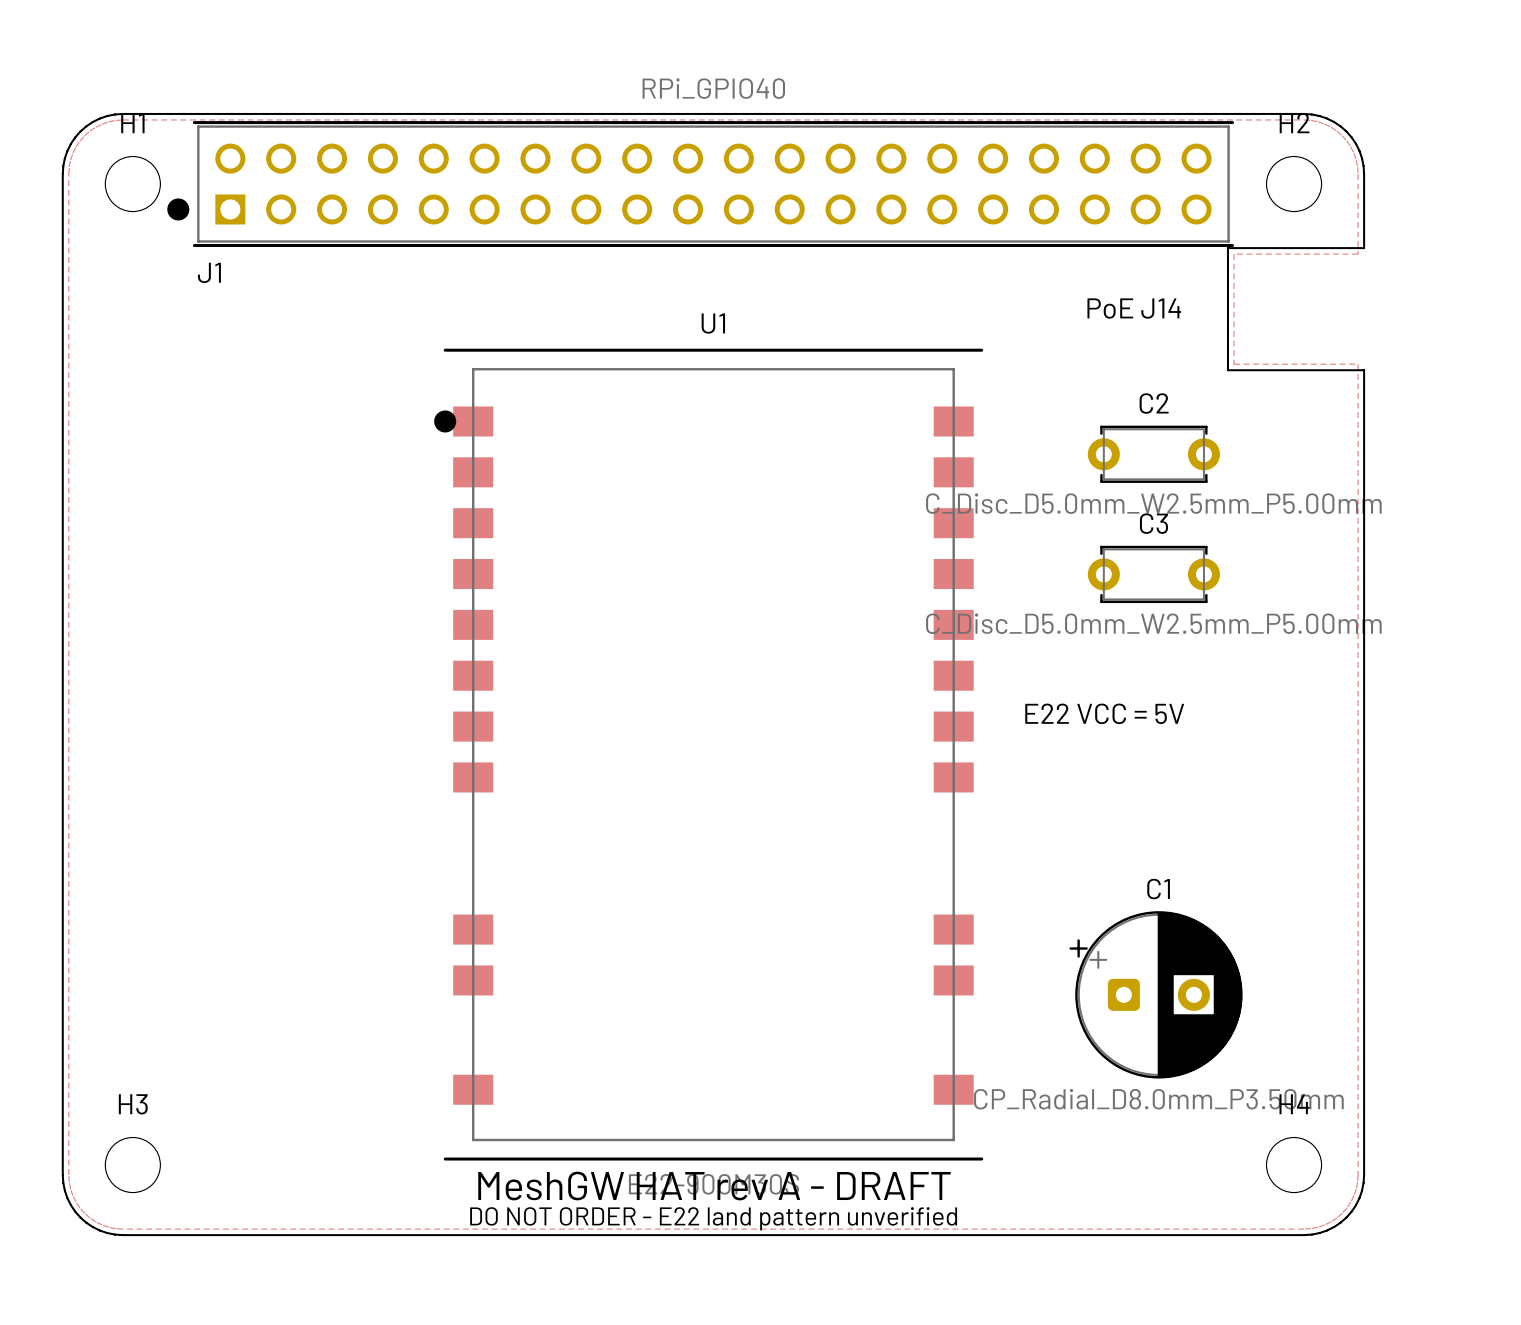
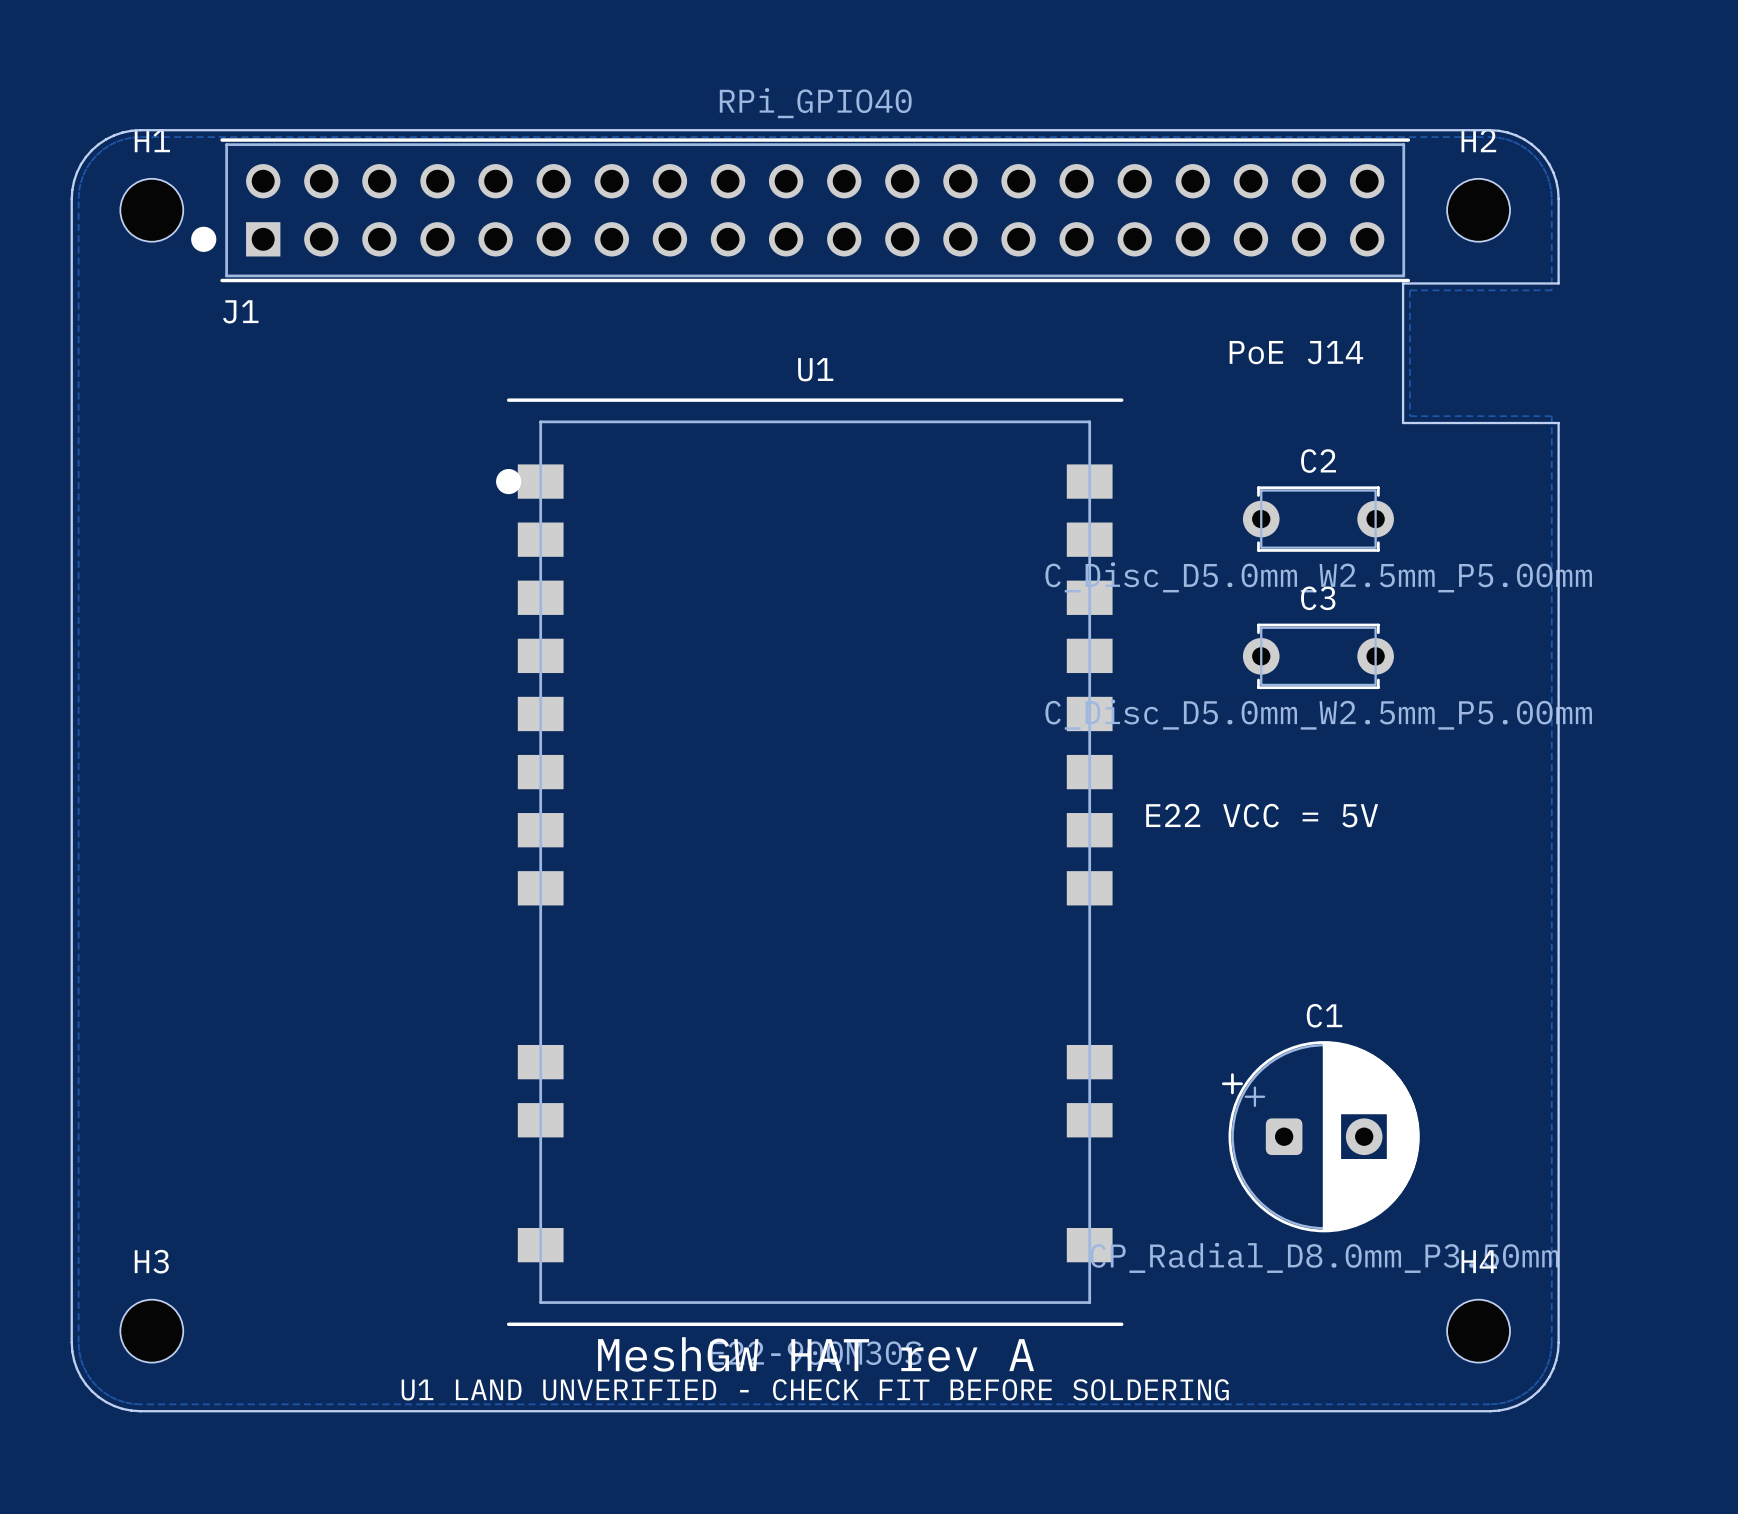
text: MeshGW HAT rev A - DRAFT (714, 1186) -> MeshGW HAT rev A (816, 1354)
text: DO NOT ORDER - E22 land pattern unverified (713, 1218) -> U1 LAND UNVERIFIED - CHECK FIT BEFORE SOLDERING (815, 1389)

